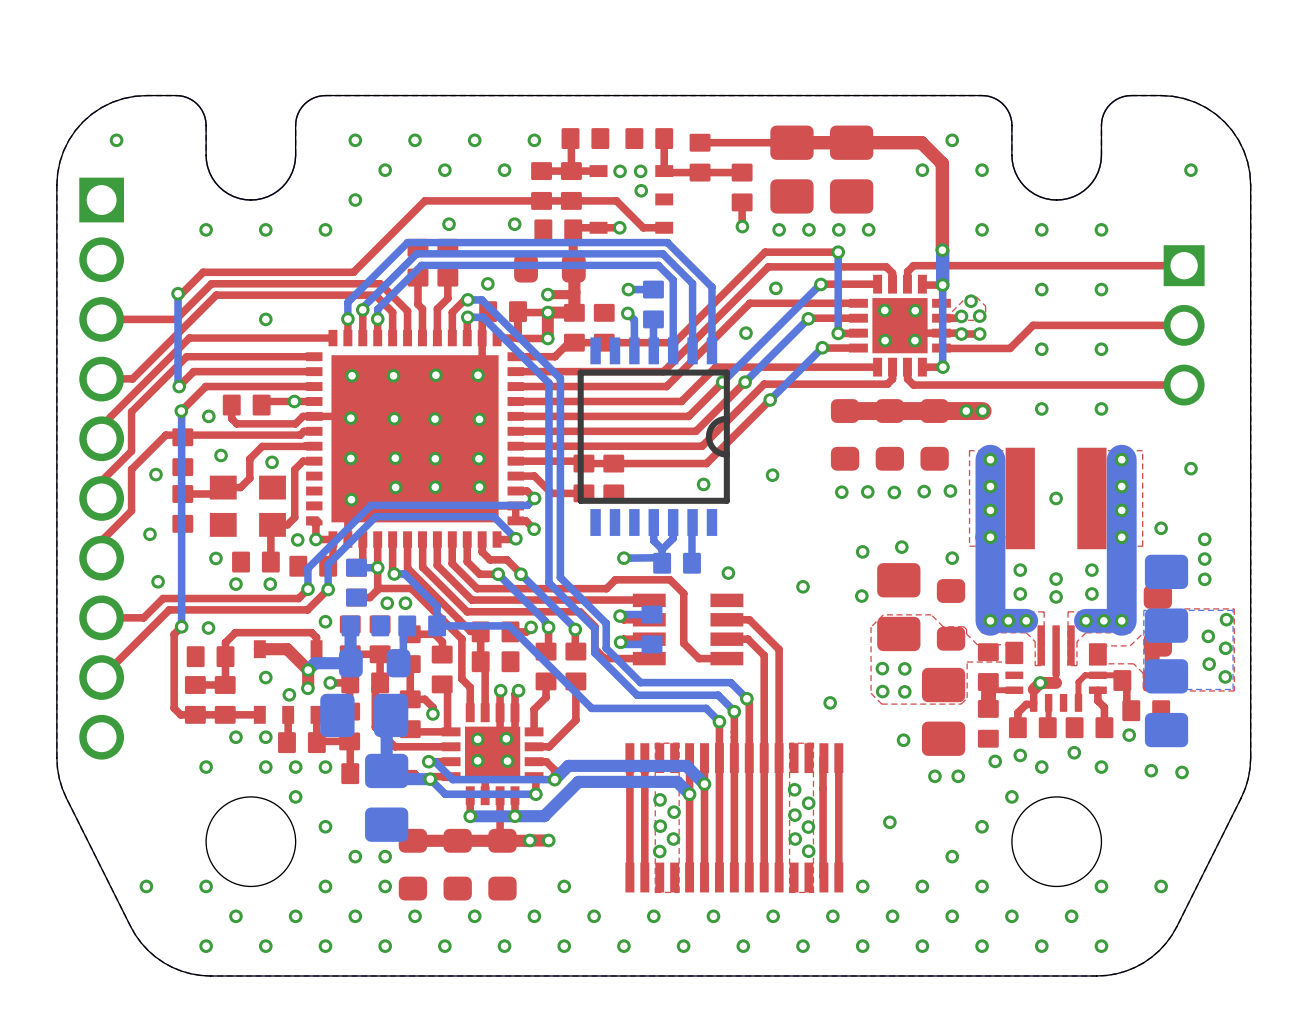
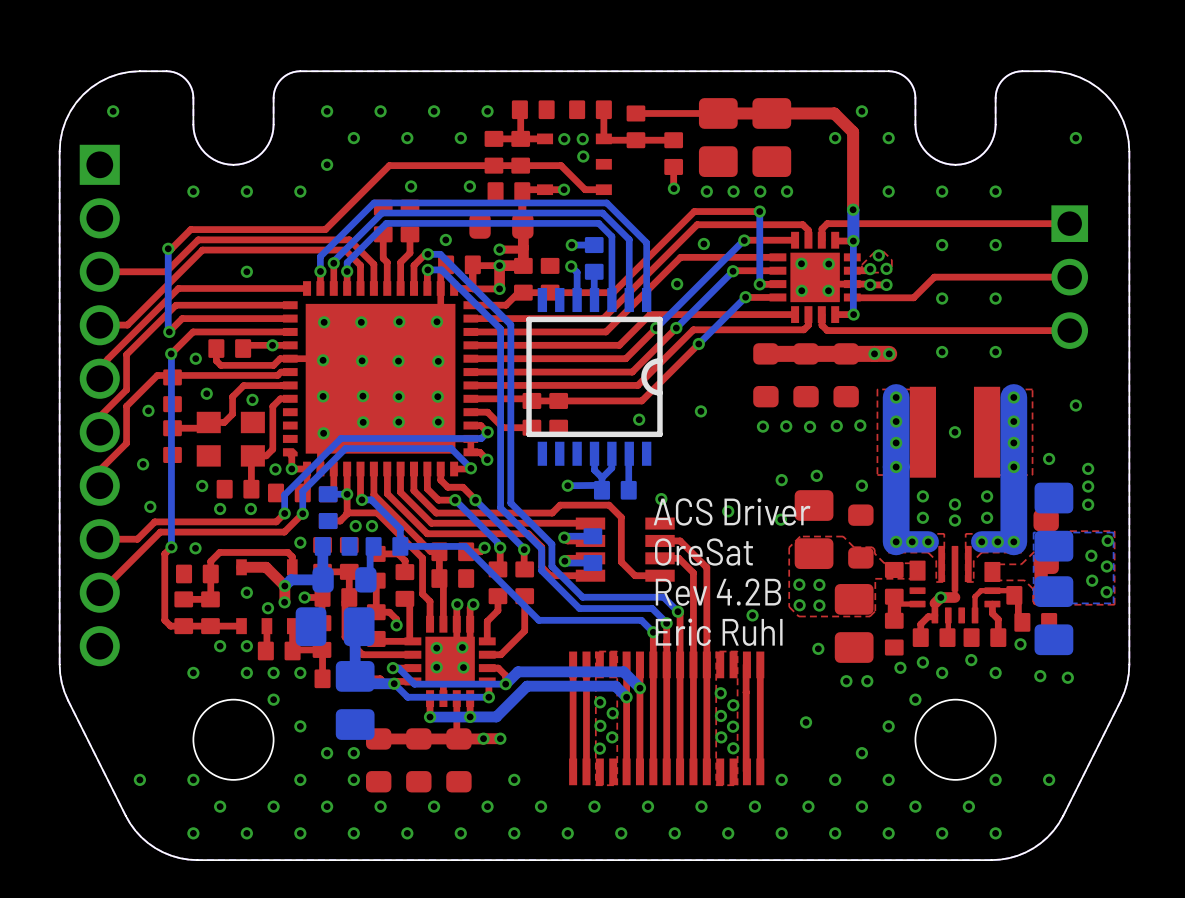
text: none -> ACS Driver (732, 511)
text: none -> OreSat (703, 552)
text: none -> Rev 4.2B (718, 592)
text: none -> Eric Ruhl (719, 632)

